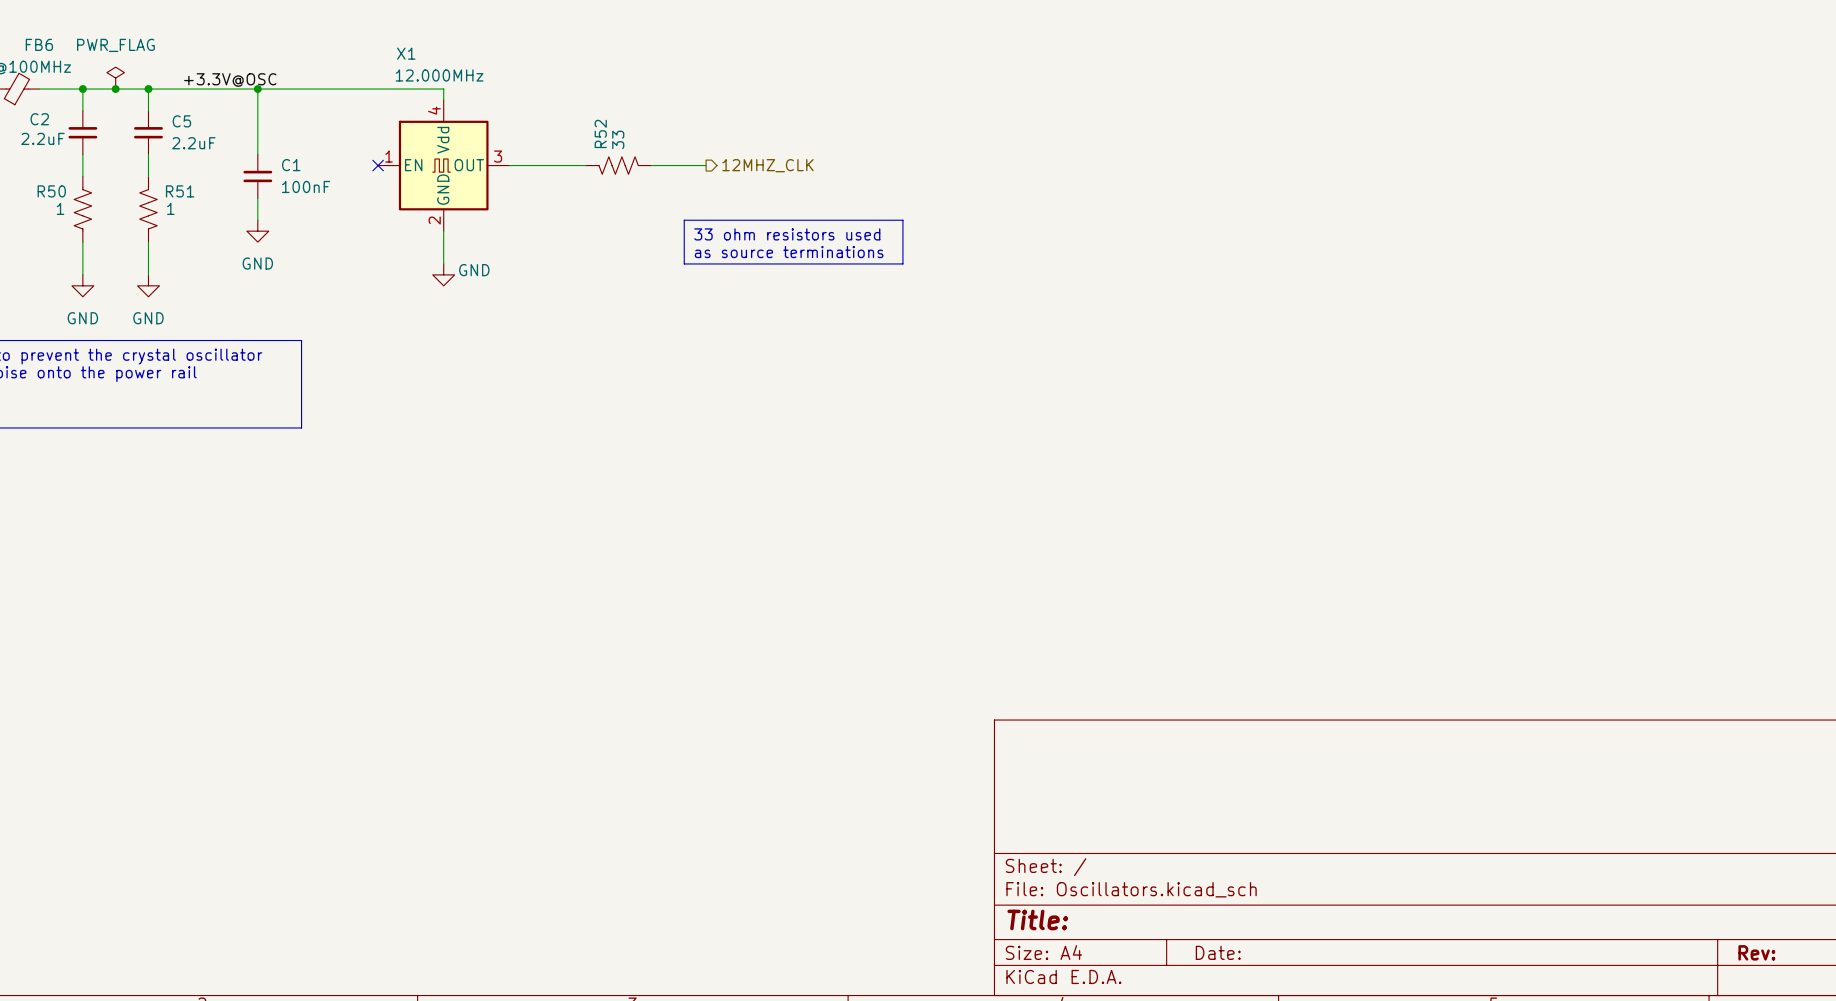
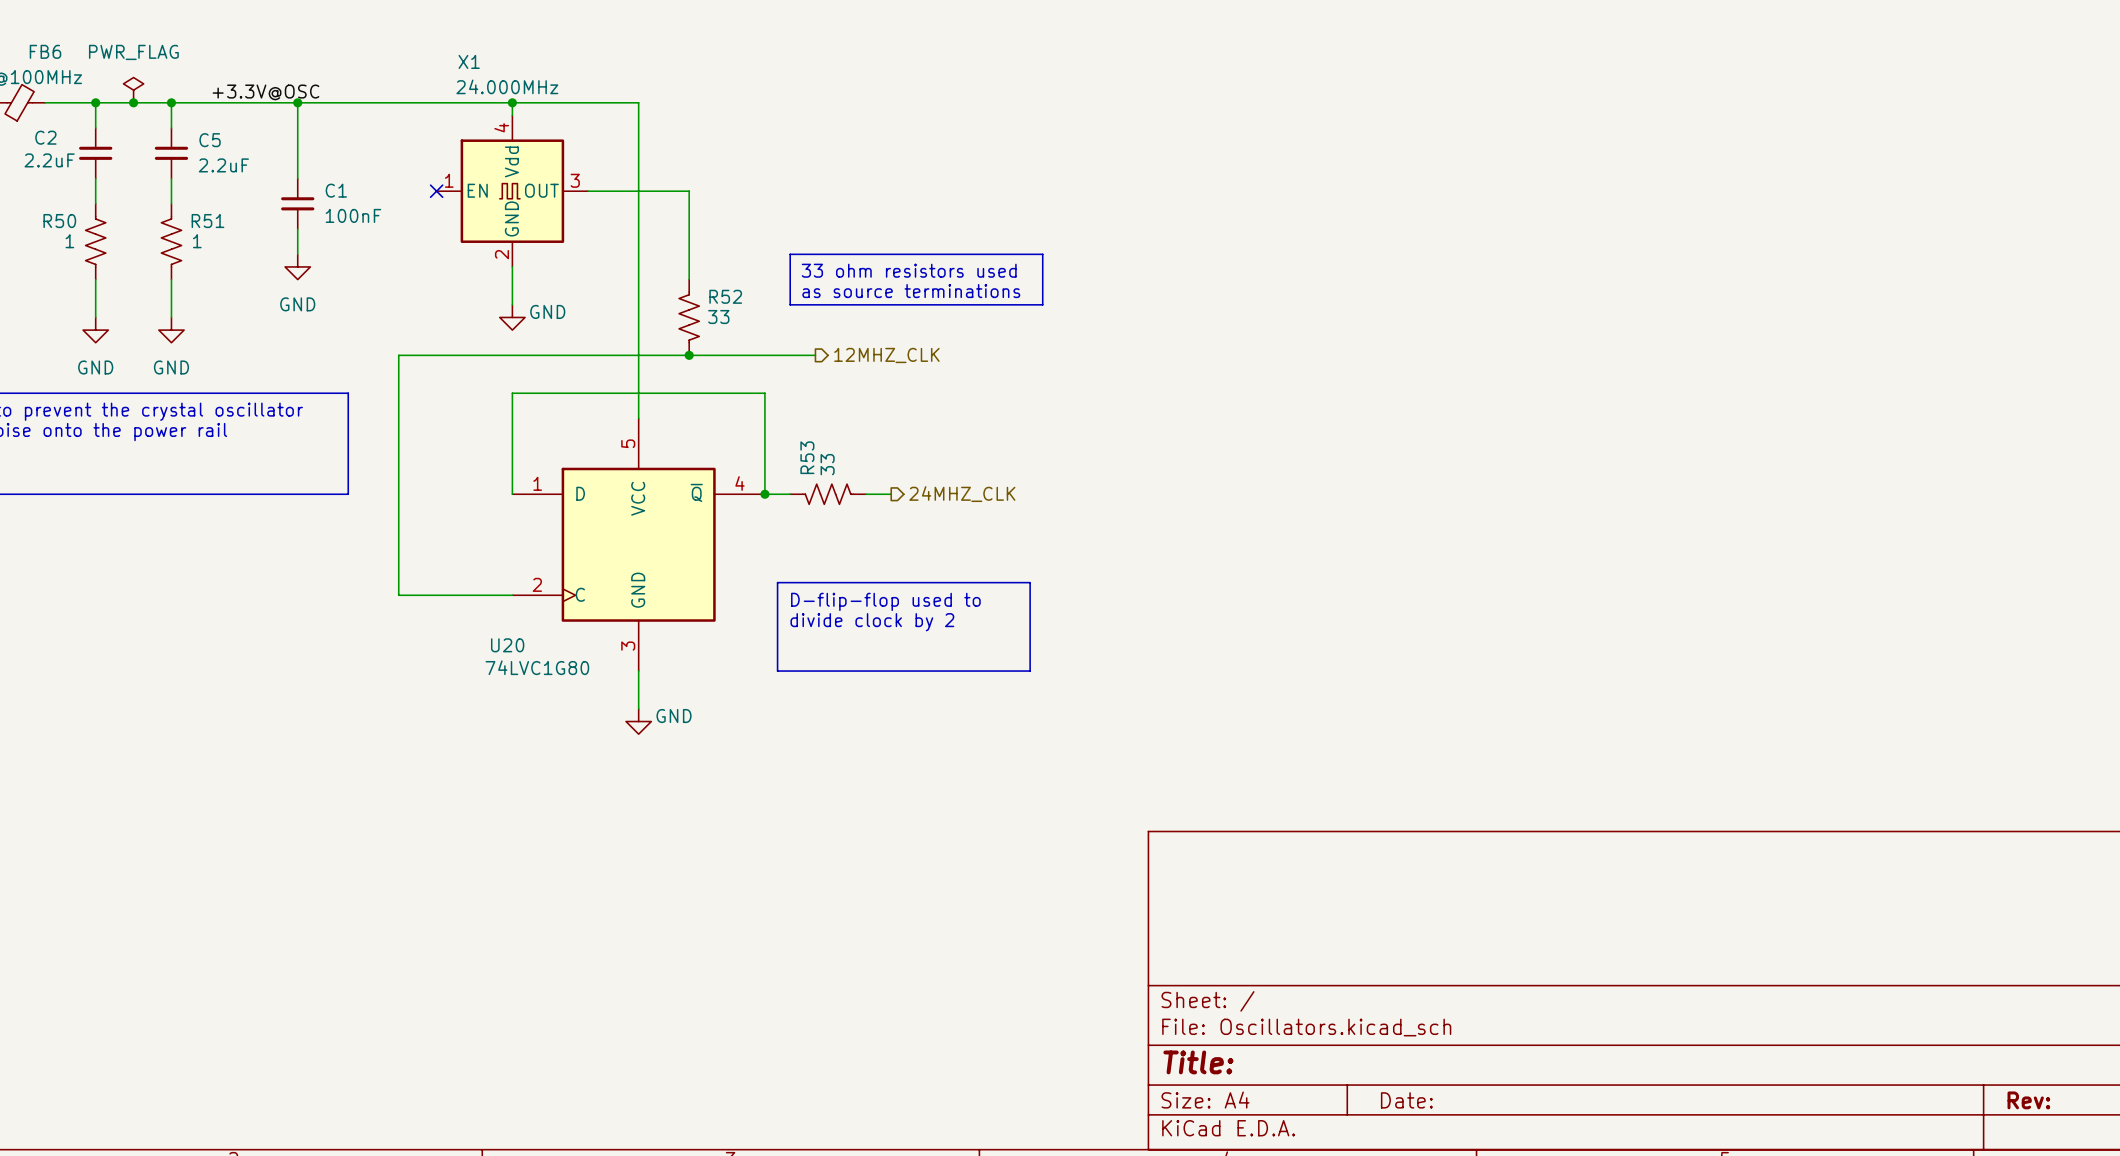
X1 value: 12.000MHz (439, 75) -> 24.000MHz (507, 86)
wire: none -> (512, 102) (638, 102) (638, 418)
junction: none -> (512, 102)
wire: none -> (676, 191) (689, 191) (689, 279)
R52 rotation: 0° (618, 165) -> 90° clockwise (689, 317)
R52 position: (618, 165) -> (689, 317)
wire: (651, 165) (706, 165) -> none
hierarchical label position: 12MHZ_CLK (767, 165) -> 12MHZ_CLK (886, 355)
junction: none -> (689, 355)
wire: none -> (815, 355) (398, 355) (398, 595) (512, 595)
wire: none -> (512, 494) (512, 393) (764, 393) (764, 494) (790, 494)
junction: none -> (764, 494)
R53: none -> 33 (828, 494)
wire: none -> (865, 494) (891, 494)
hierarchical label: none -> 24MHZ_CLK (962, 494)
U20: none -> 74LVC1G80 (638, 544)
line: none -> (777, 582) (1030, 582) (1030, 671) (777, 671) (777, 582)
text: none -> D-flip-flop used to (885, 601)
text: none -> divide clock by 2 (872, 622)
wire: none -> (638, 671) (638, 708)
power symbol: none -> GND (638, 721)

